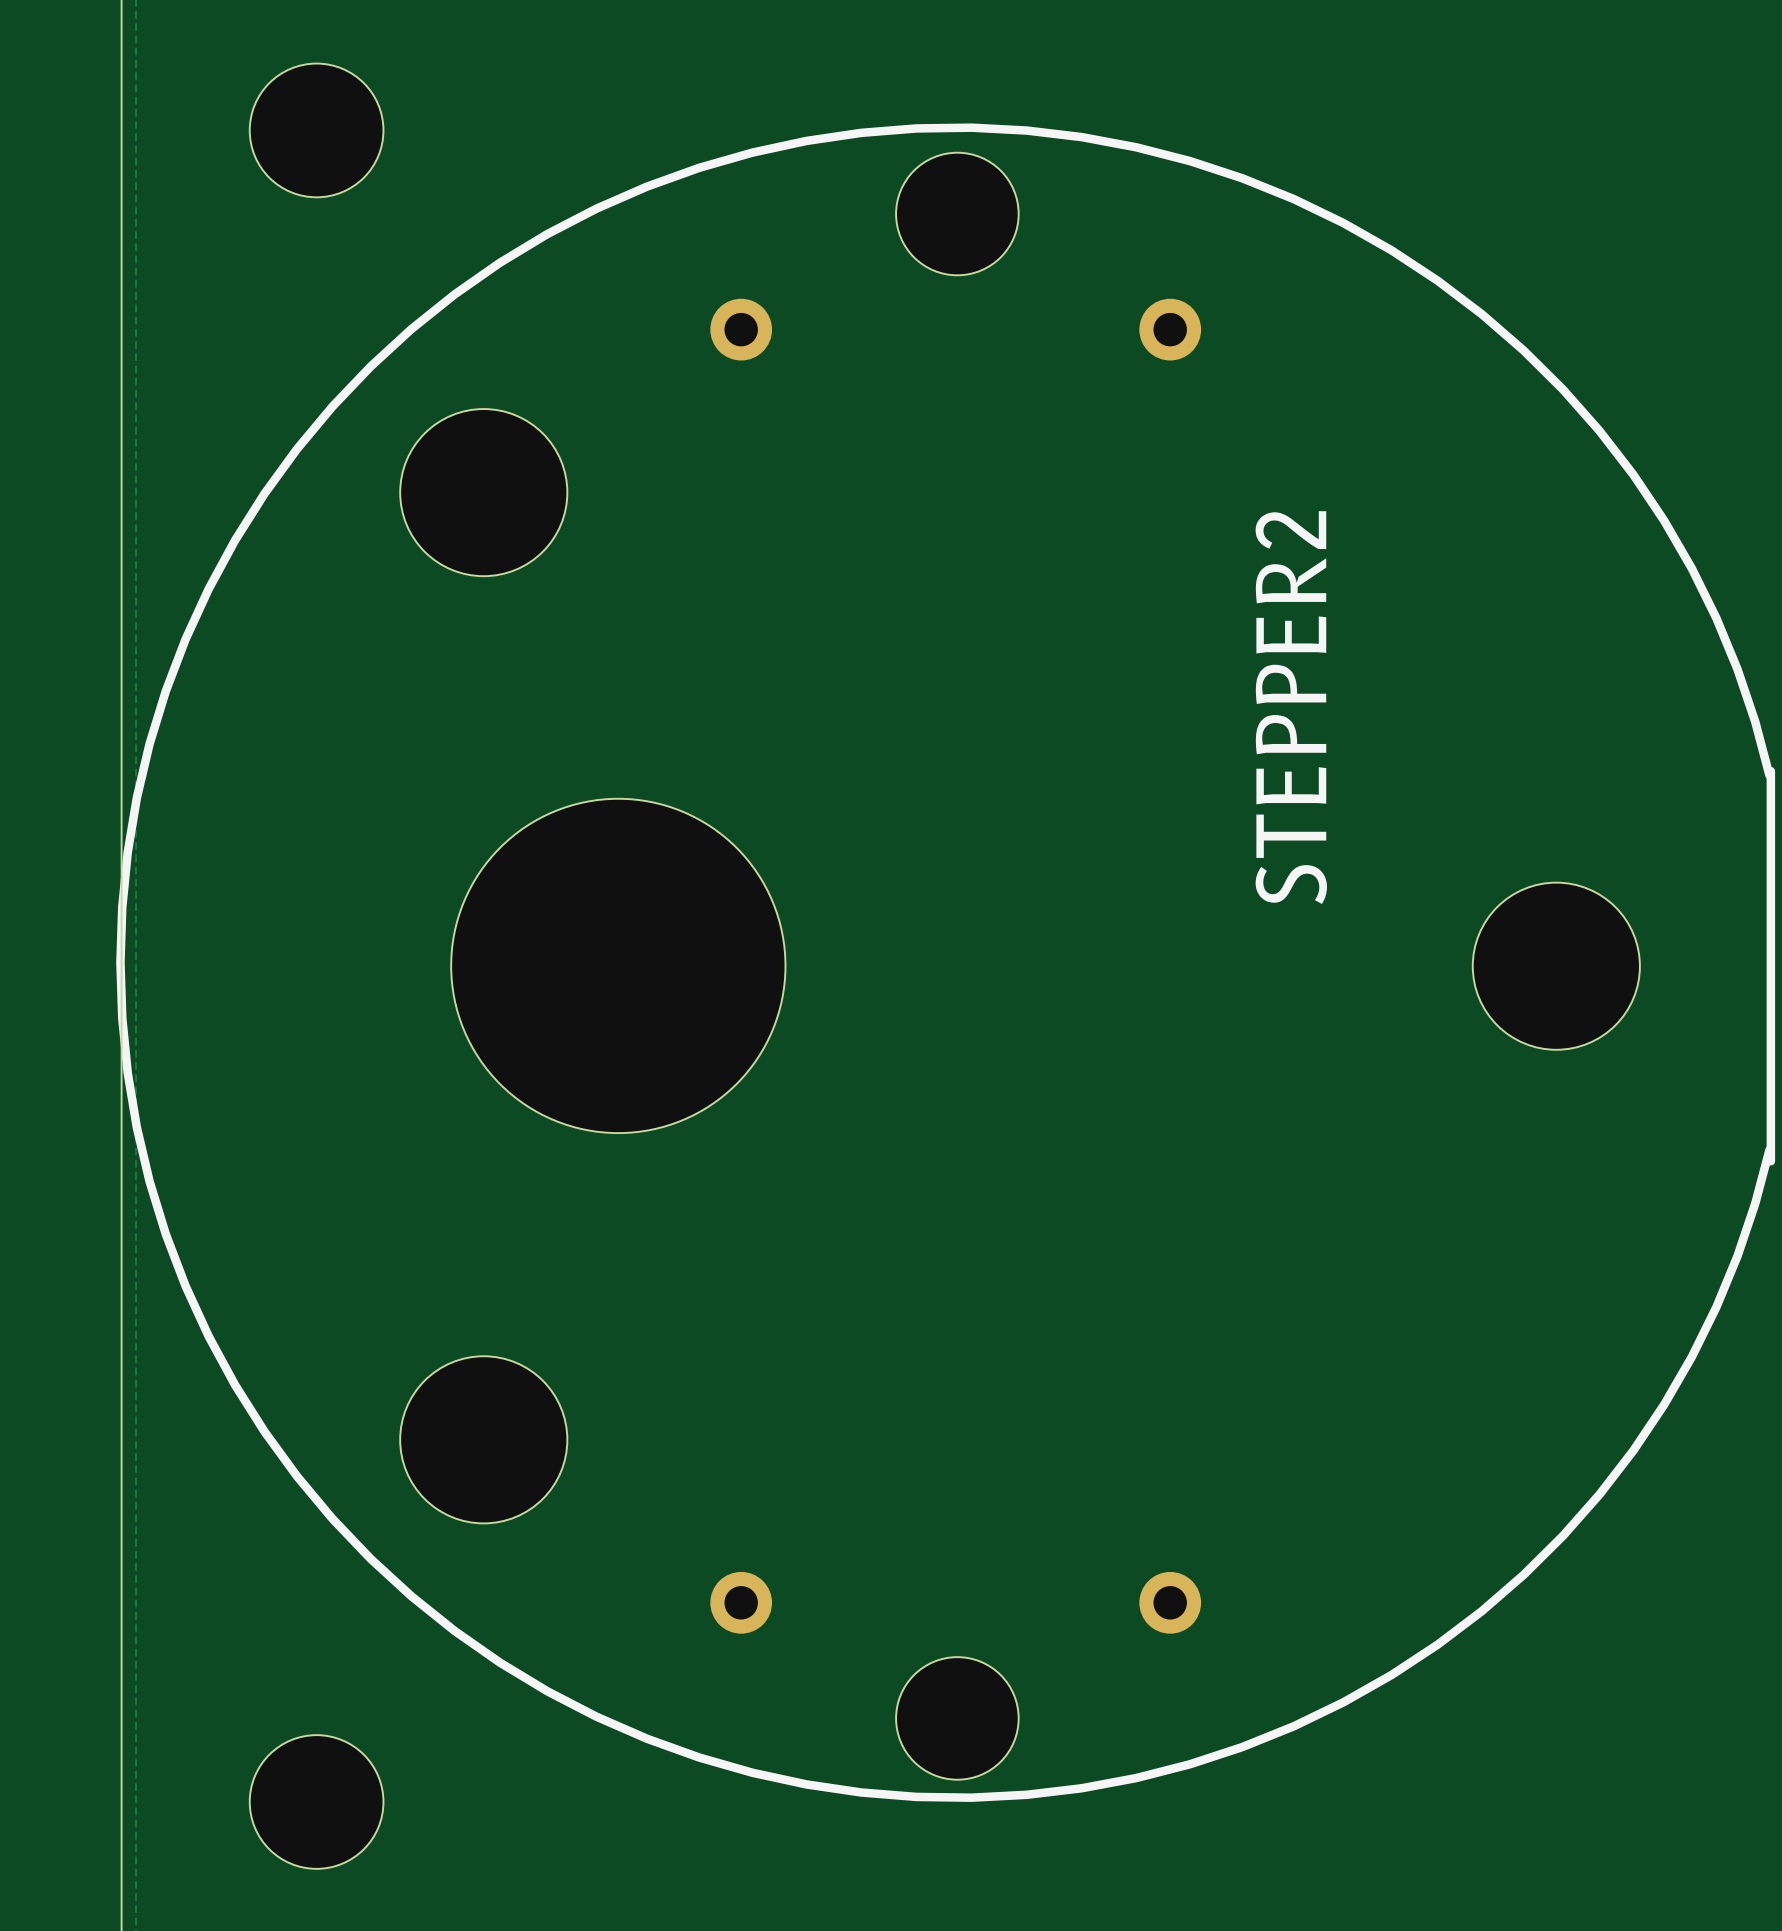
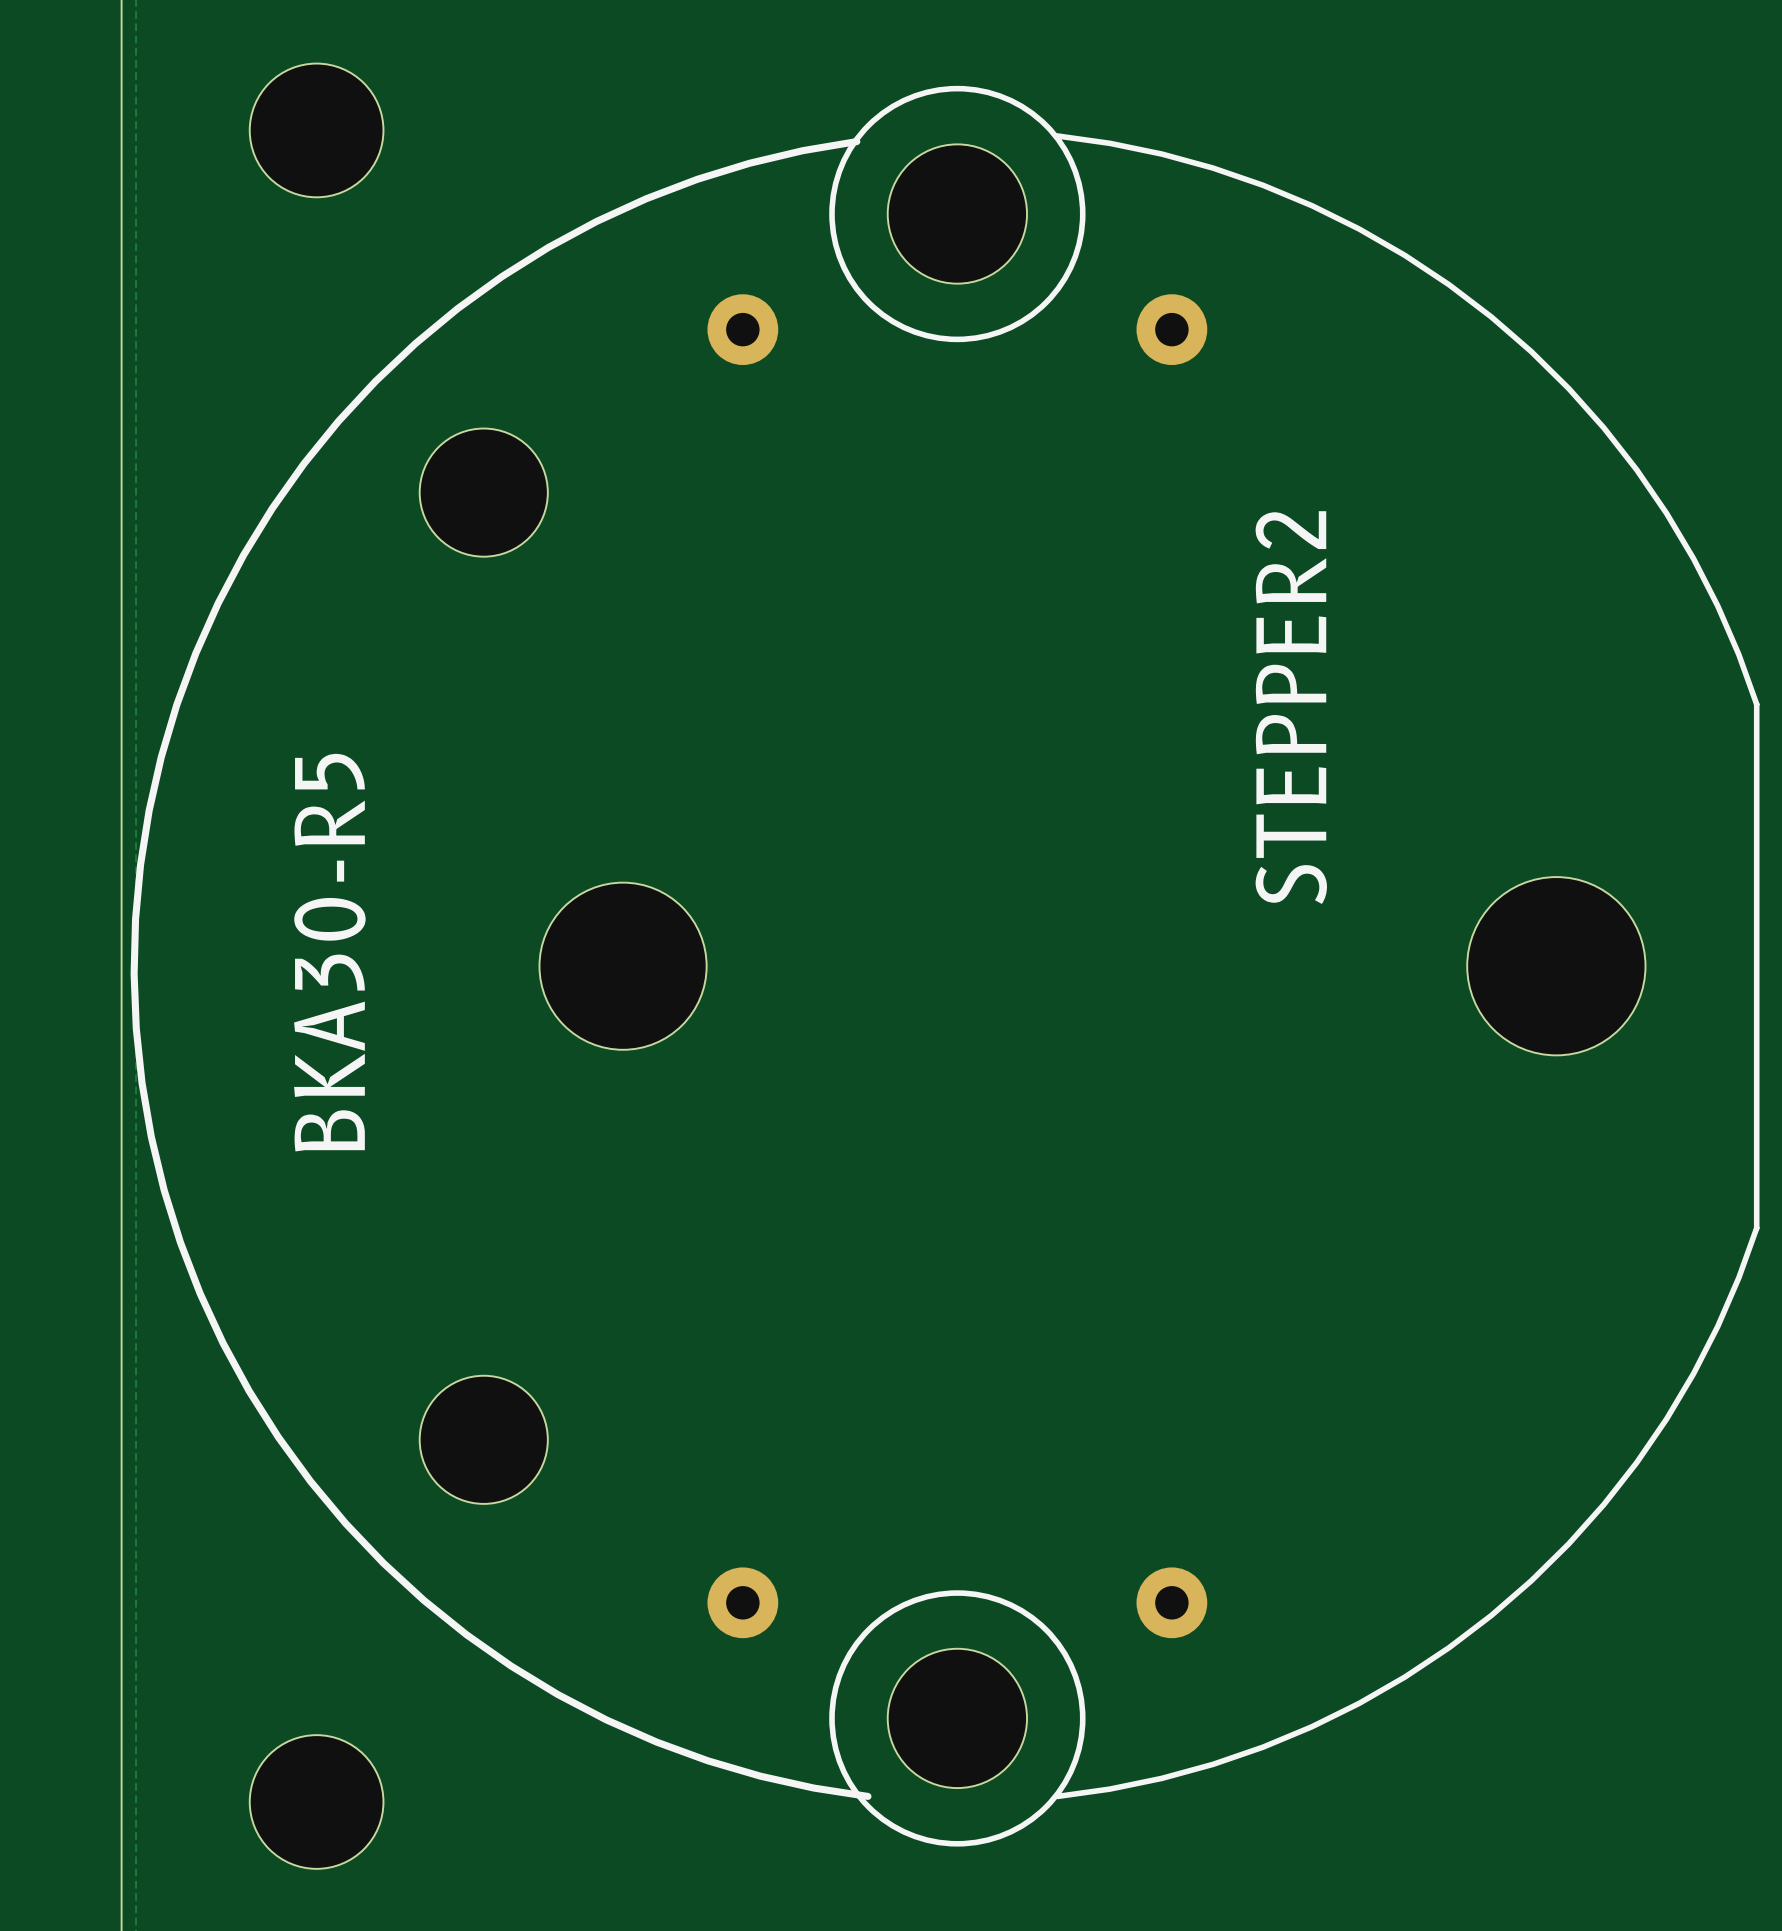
STEPPER2 footprint: [116, 123, 1776, 1802] -> [130, 85, 1760, 1847]

